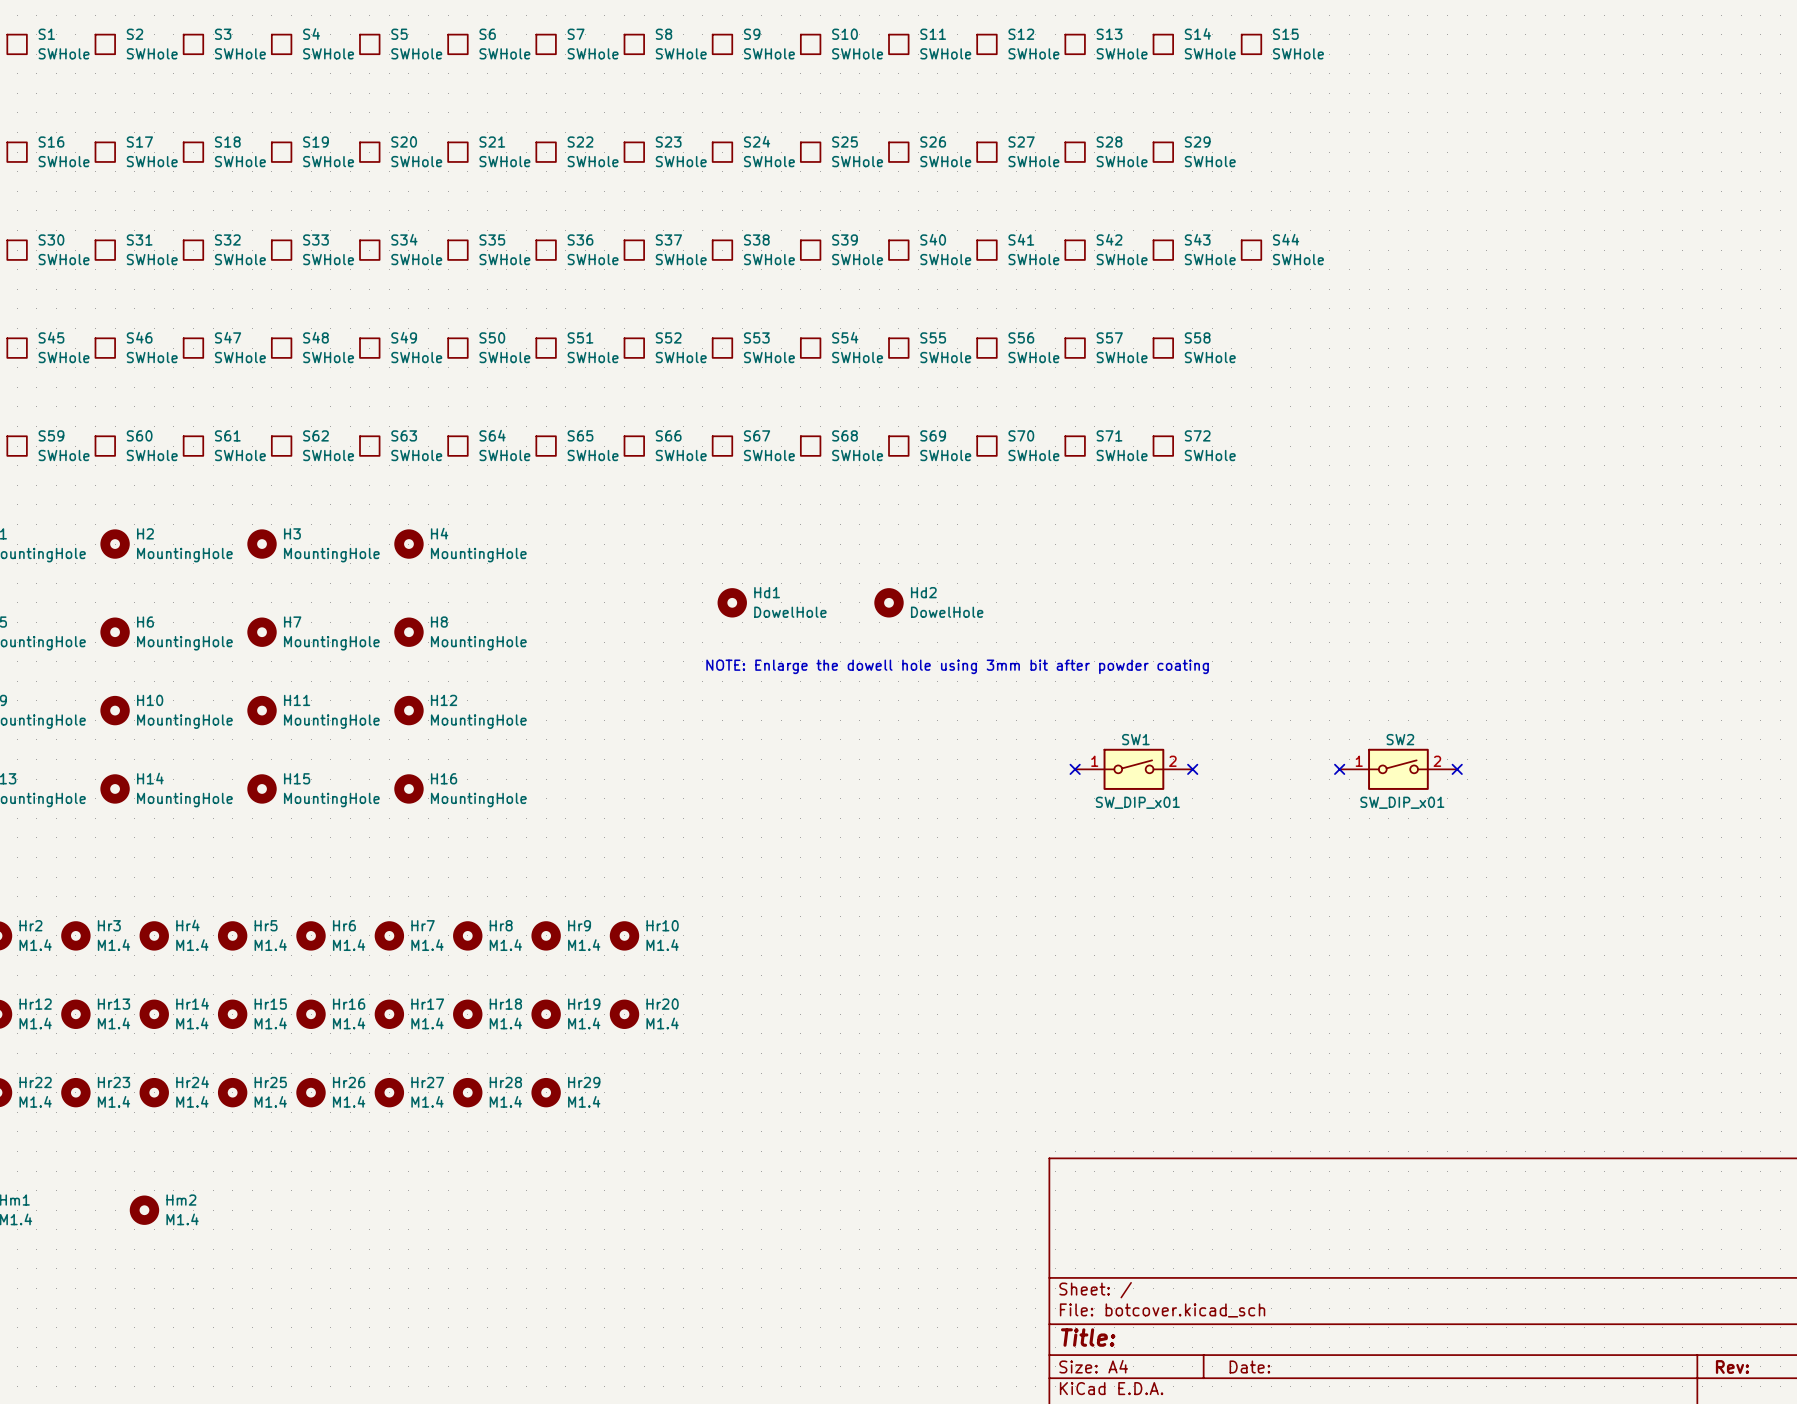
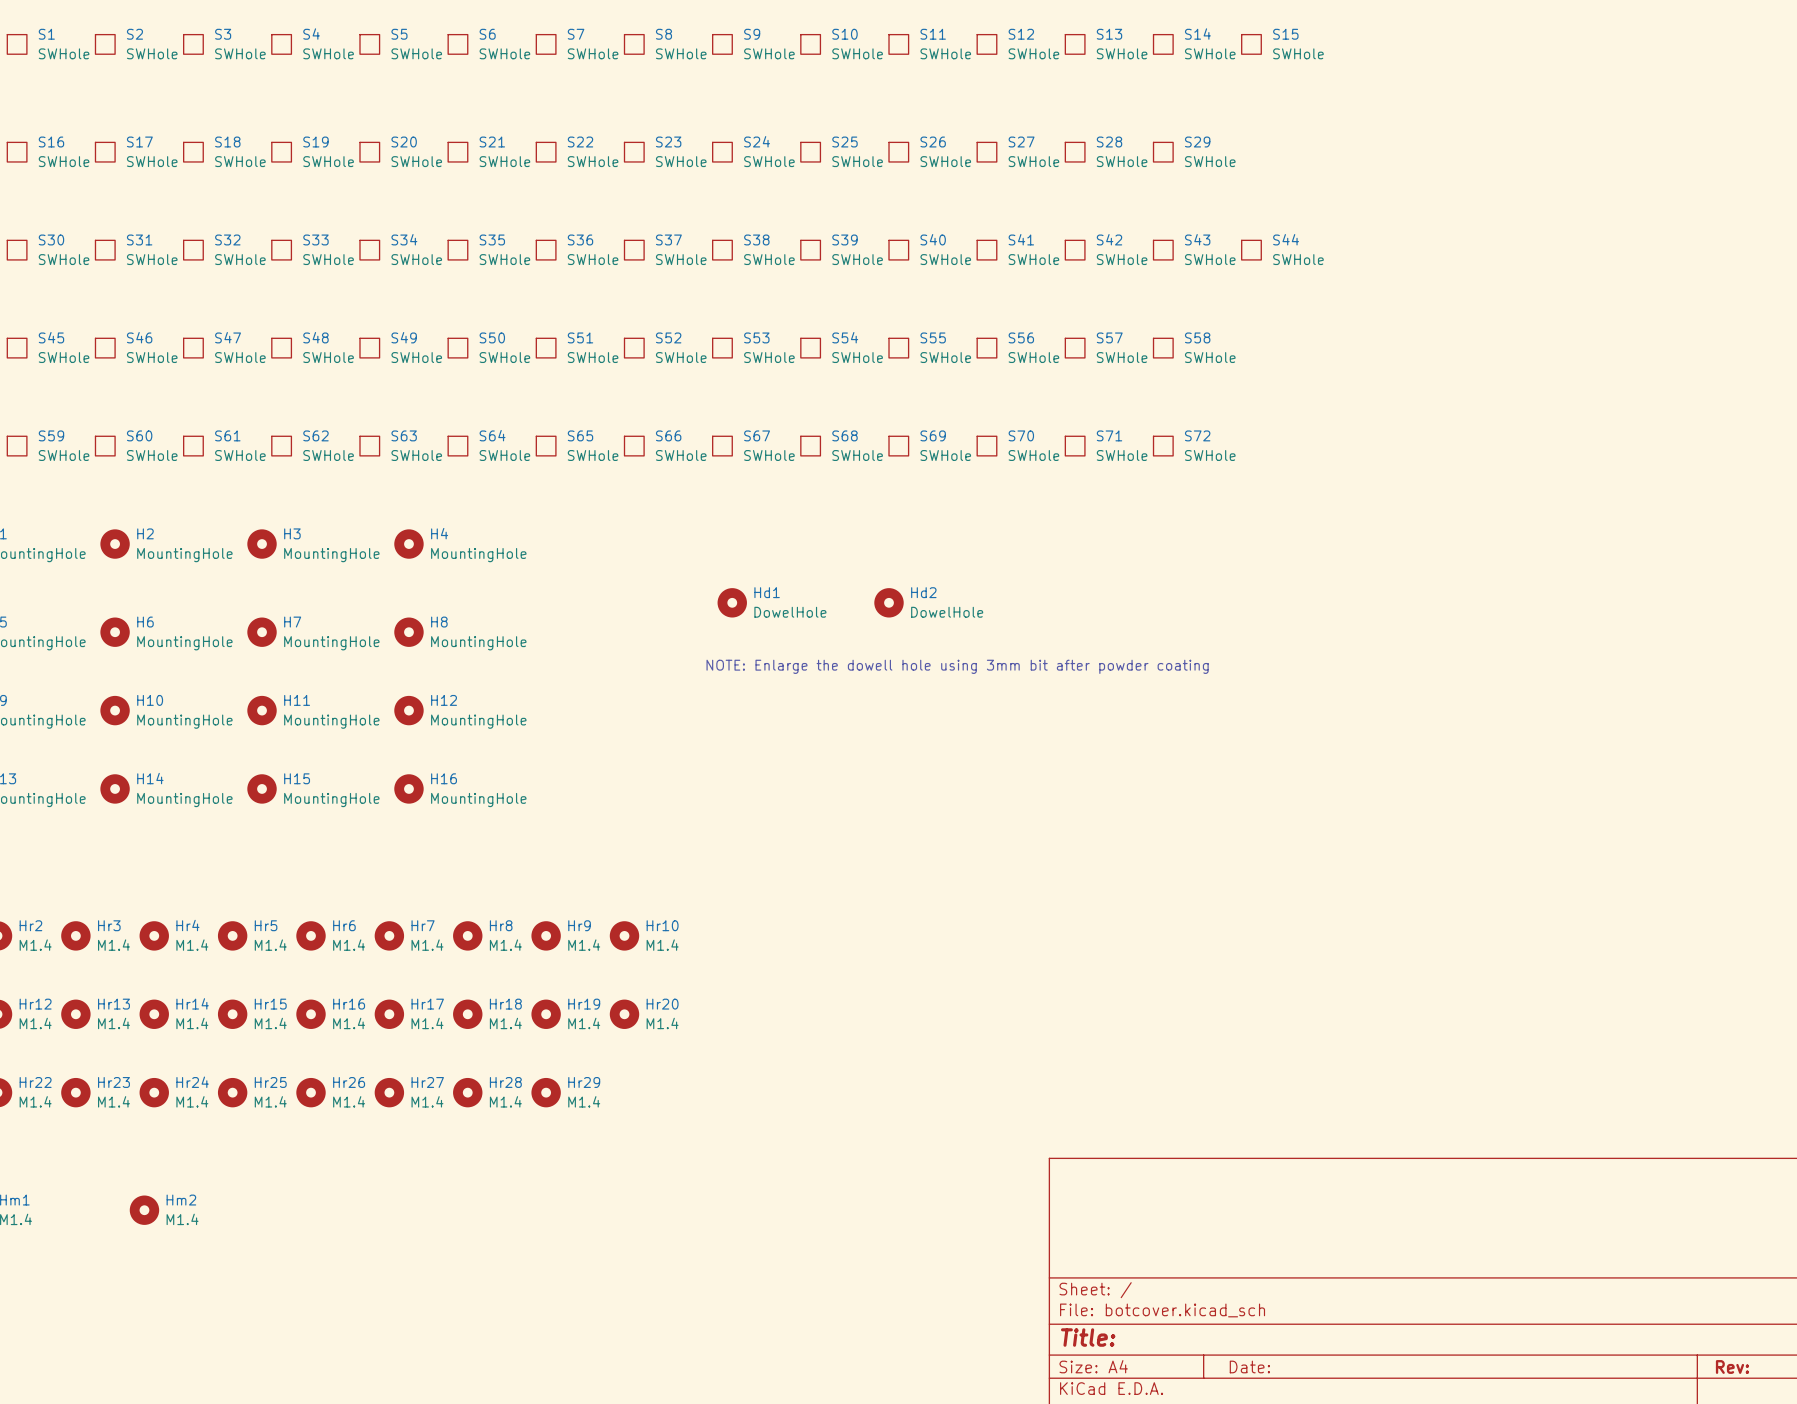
no-connect mark: (1075, 769) -> none
SW1: SW_DIP_x01 (1133, 769) -> none
no-connect mark: (1192, 769) -> none
no-connect mark: (1339, 769) -> none
SW2: SW_DIP_x01 (1398, 769) -> none
no-connect mark: (1457, 769) -> none

